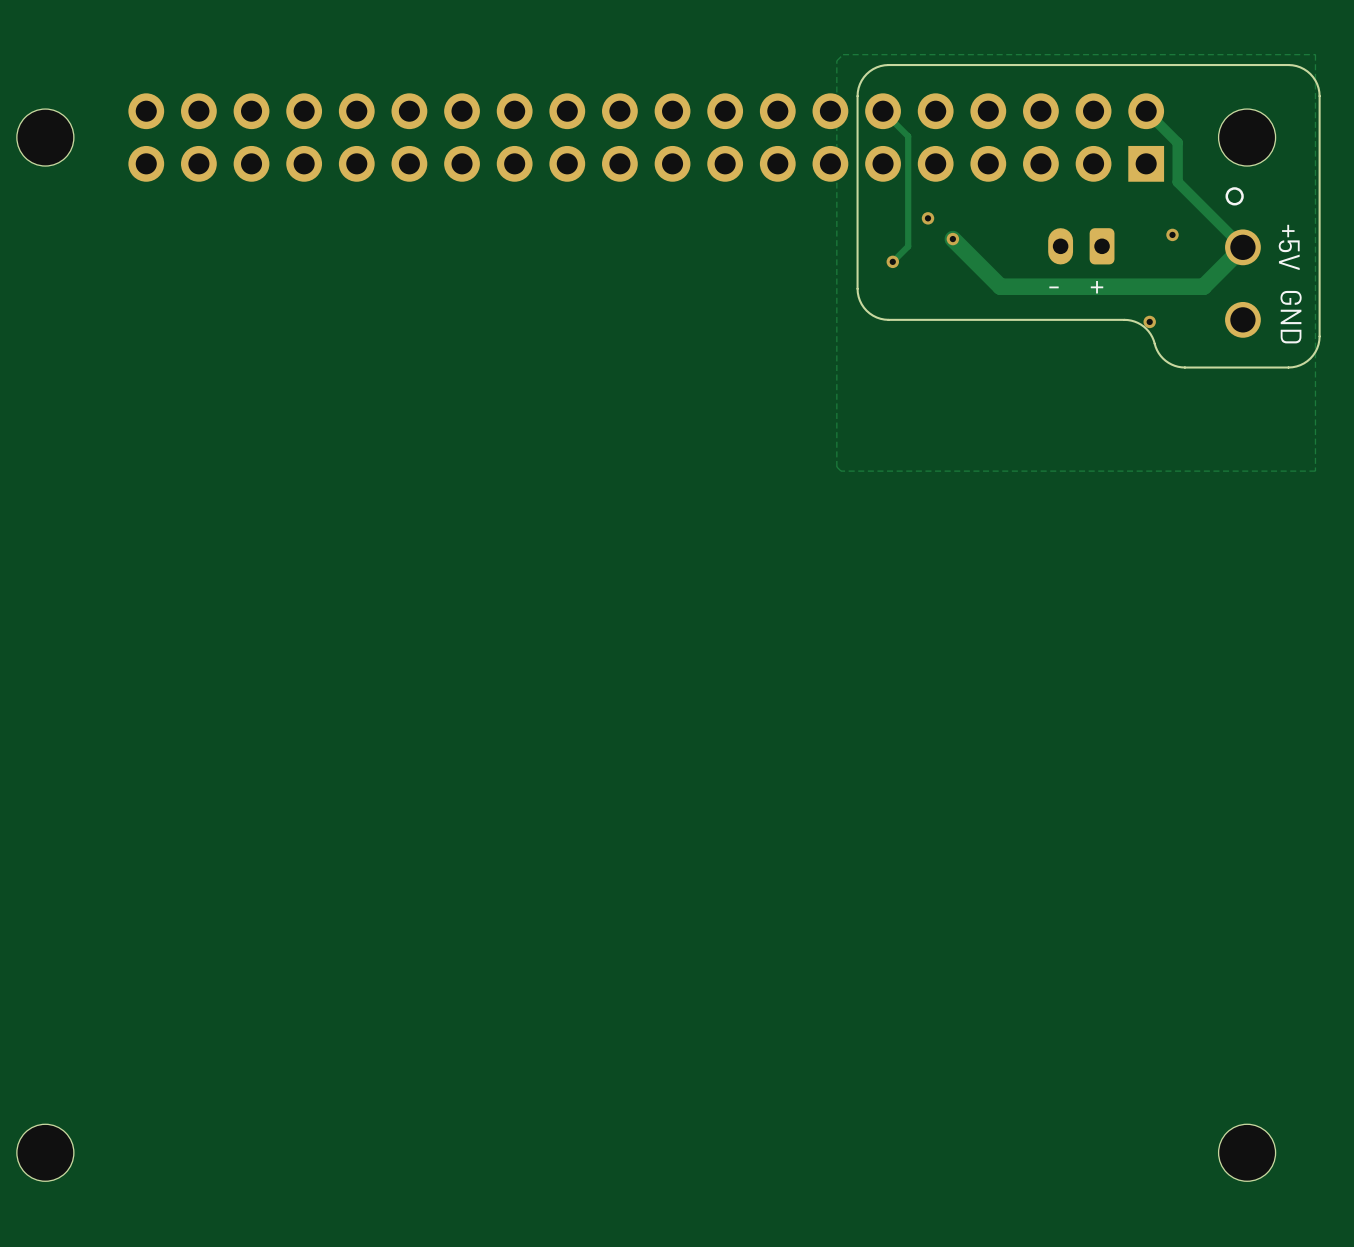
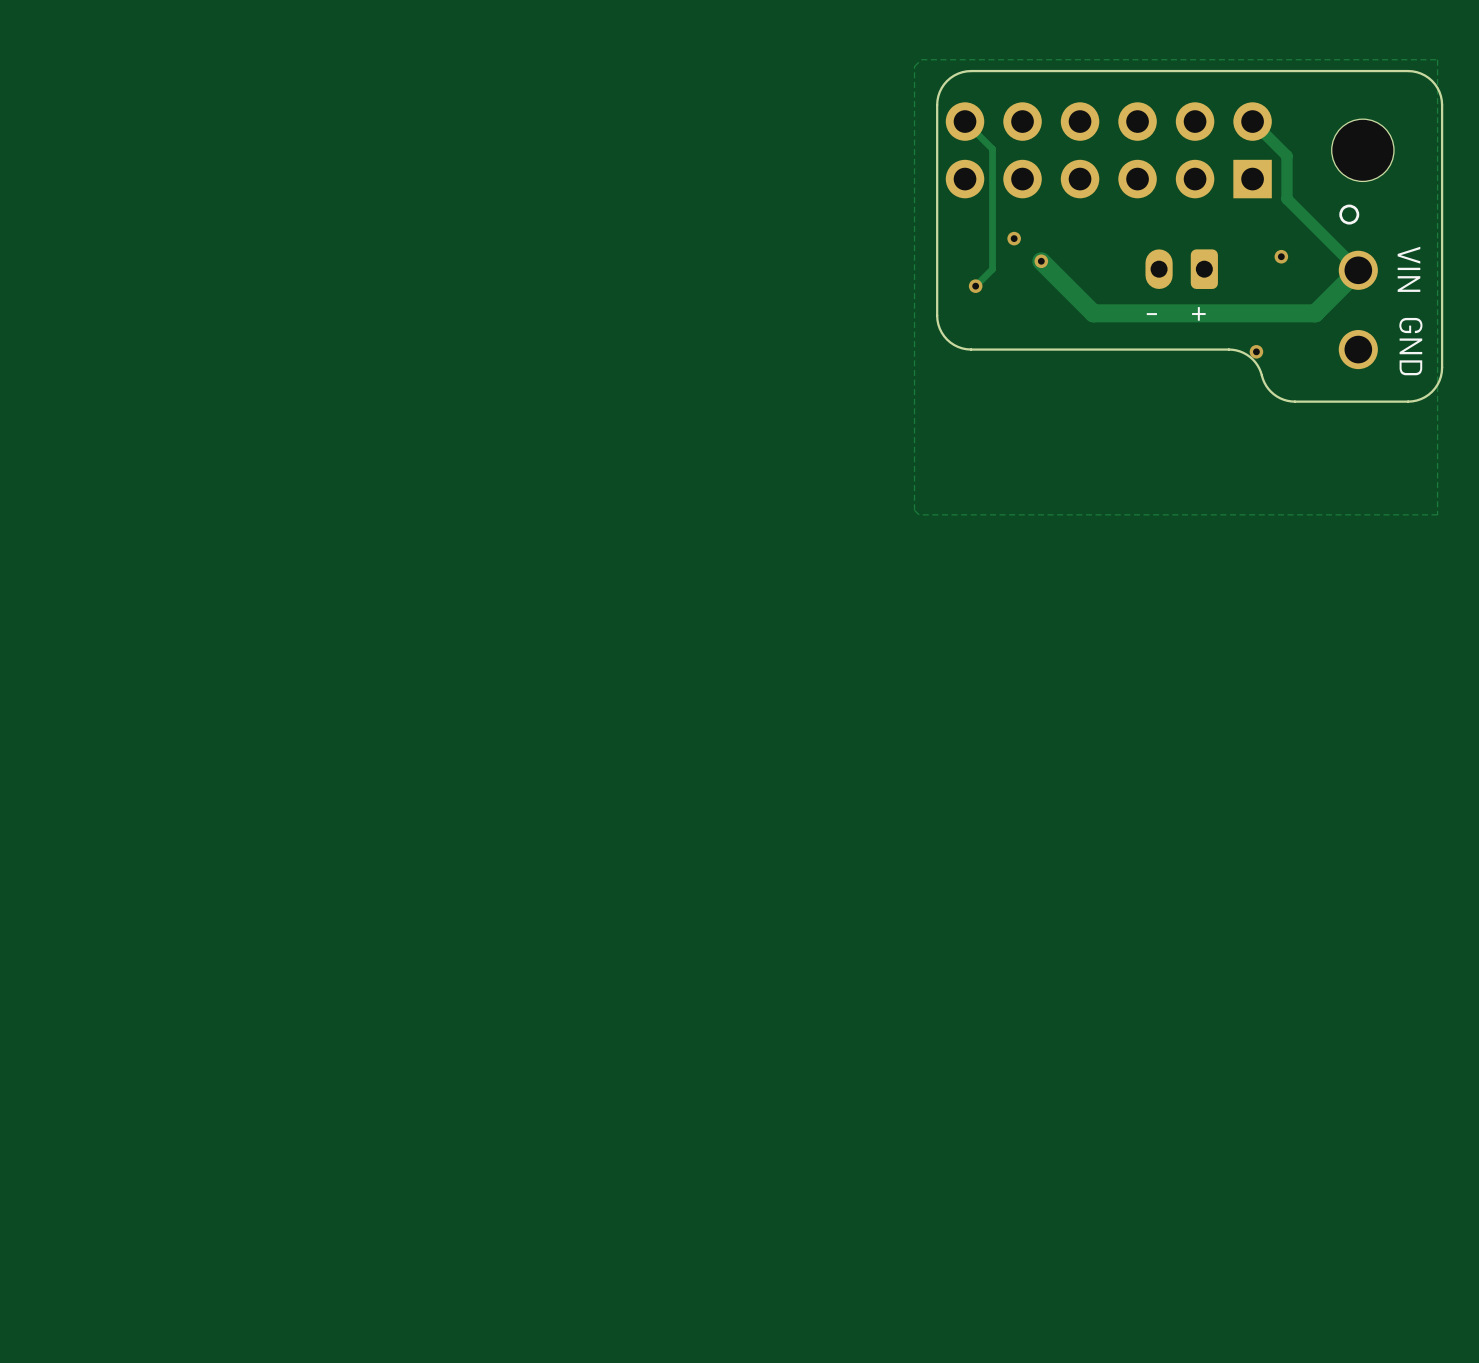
part: (45, 137) -> none
part: (646, 137) -> none
part: none -> (1108, 150)
part value: +5V (1289, 247) -> VIN (1408, 269)
part: (45, 1152) -> none
part: (1247, 1152) -> none

